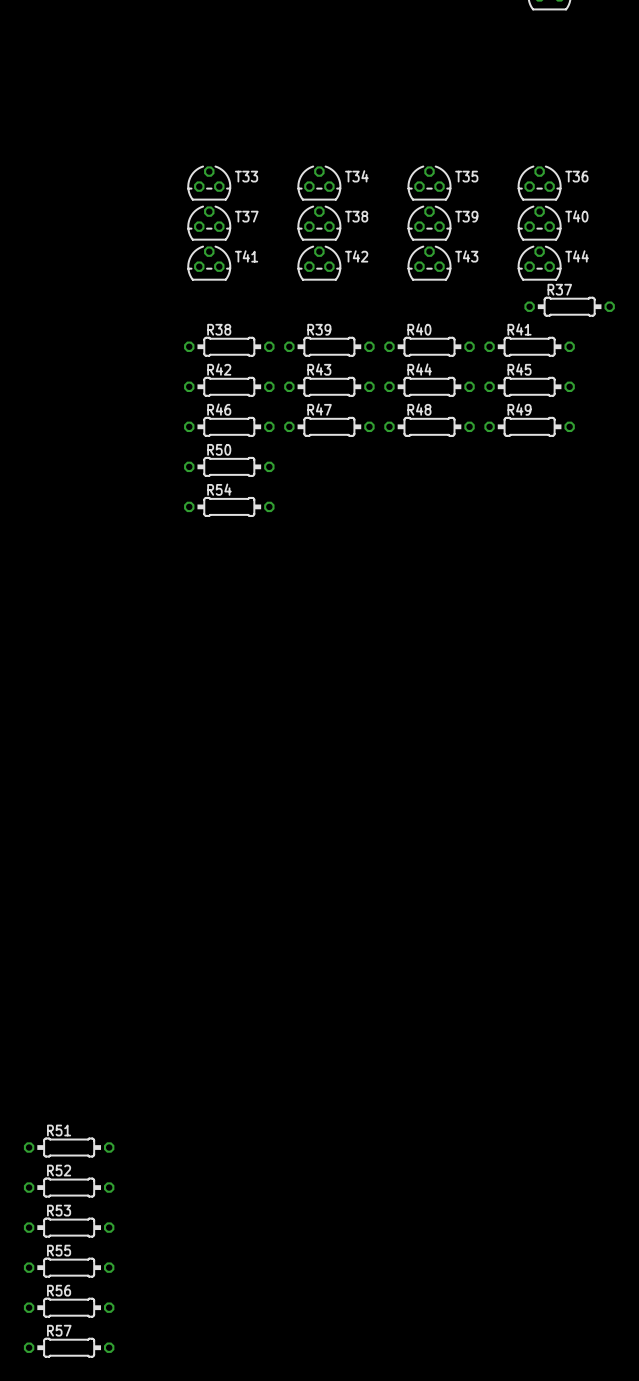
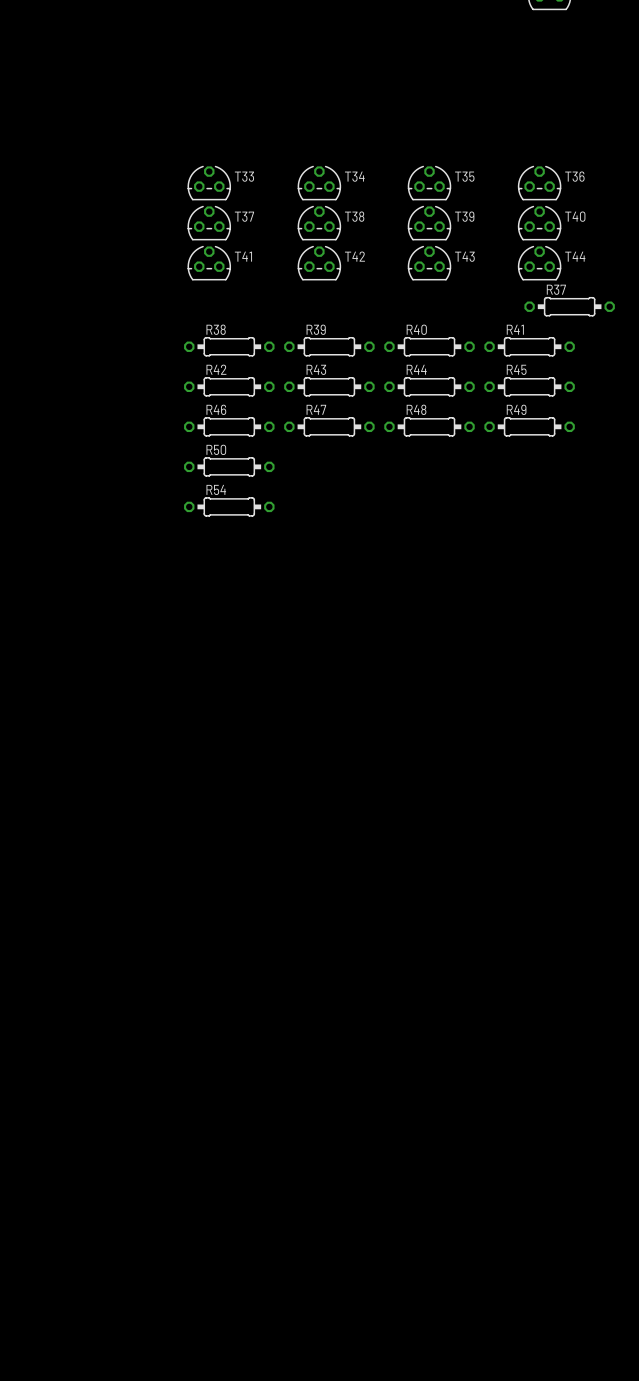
R51: (69, 1147) -> none
R52: (69, 1187) -> none
R53: (69, 1227) -> none
R55: (69, 1267) -> none
R56: (69, 1307) -> none
R57: (69, 1347) -> none

